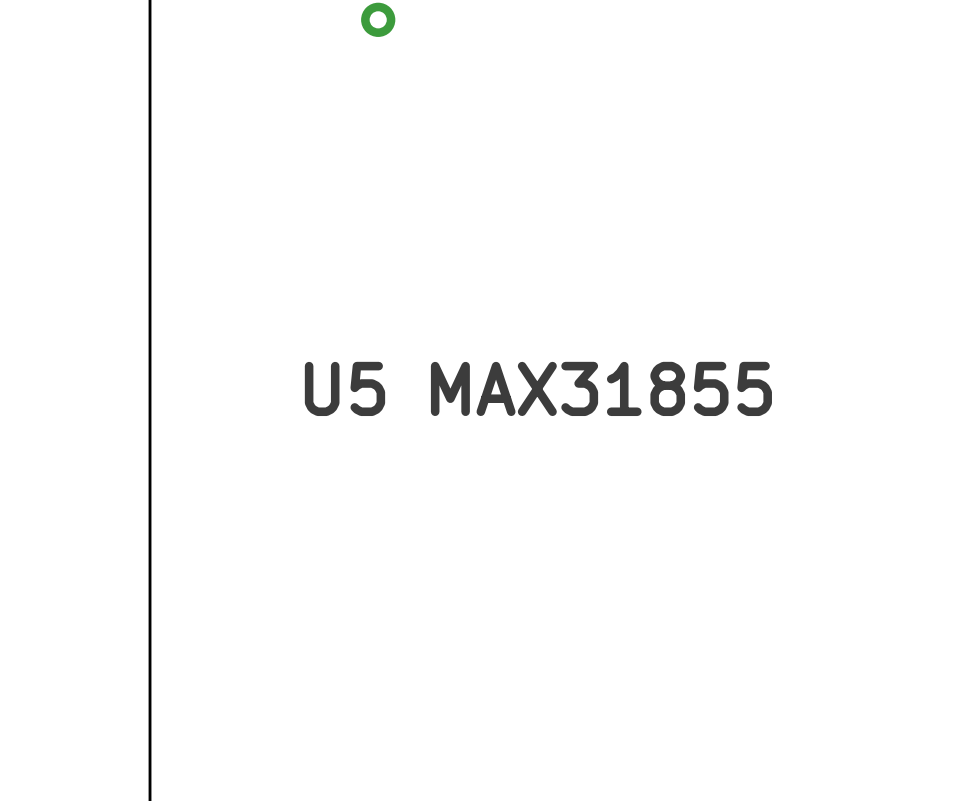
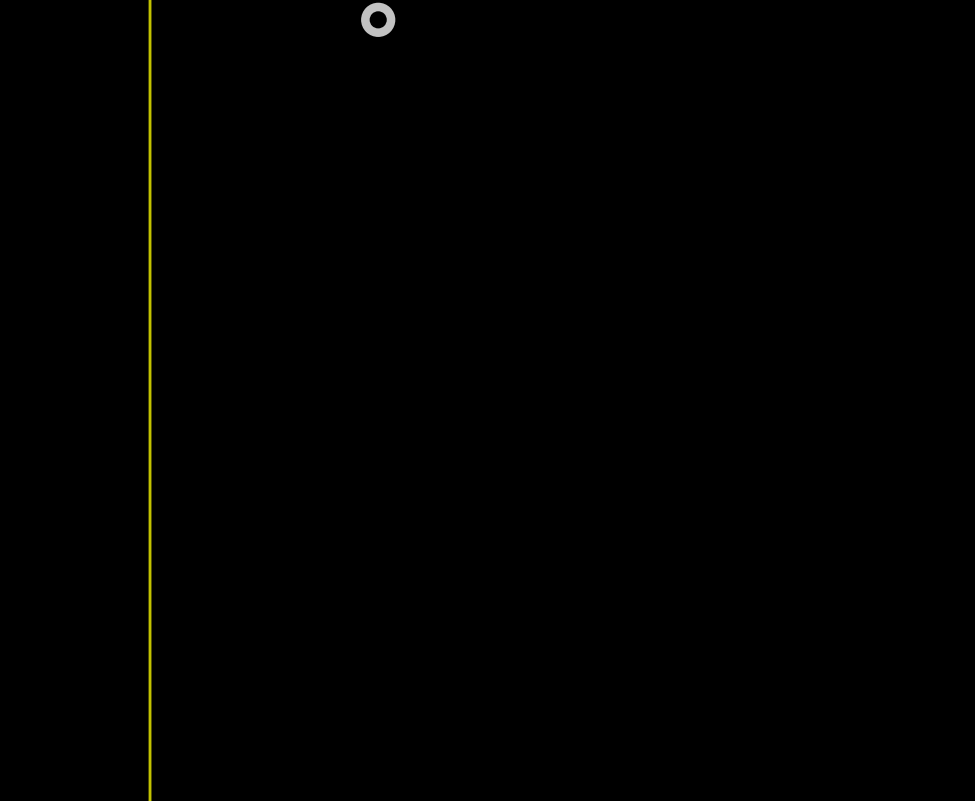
text: U5 MAX31855 (538, 388) -> none

